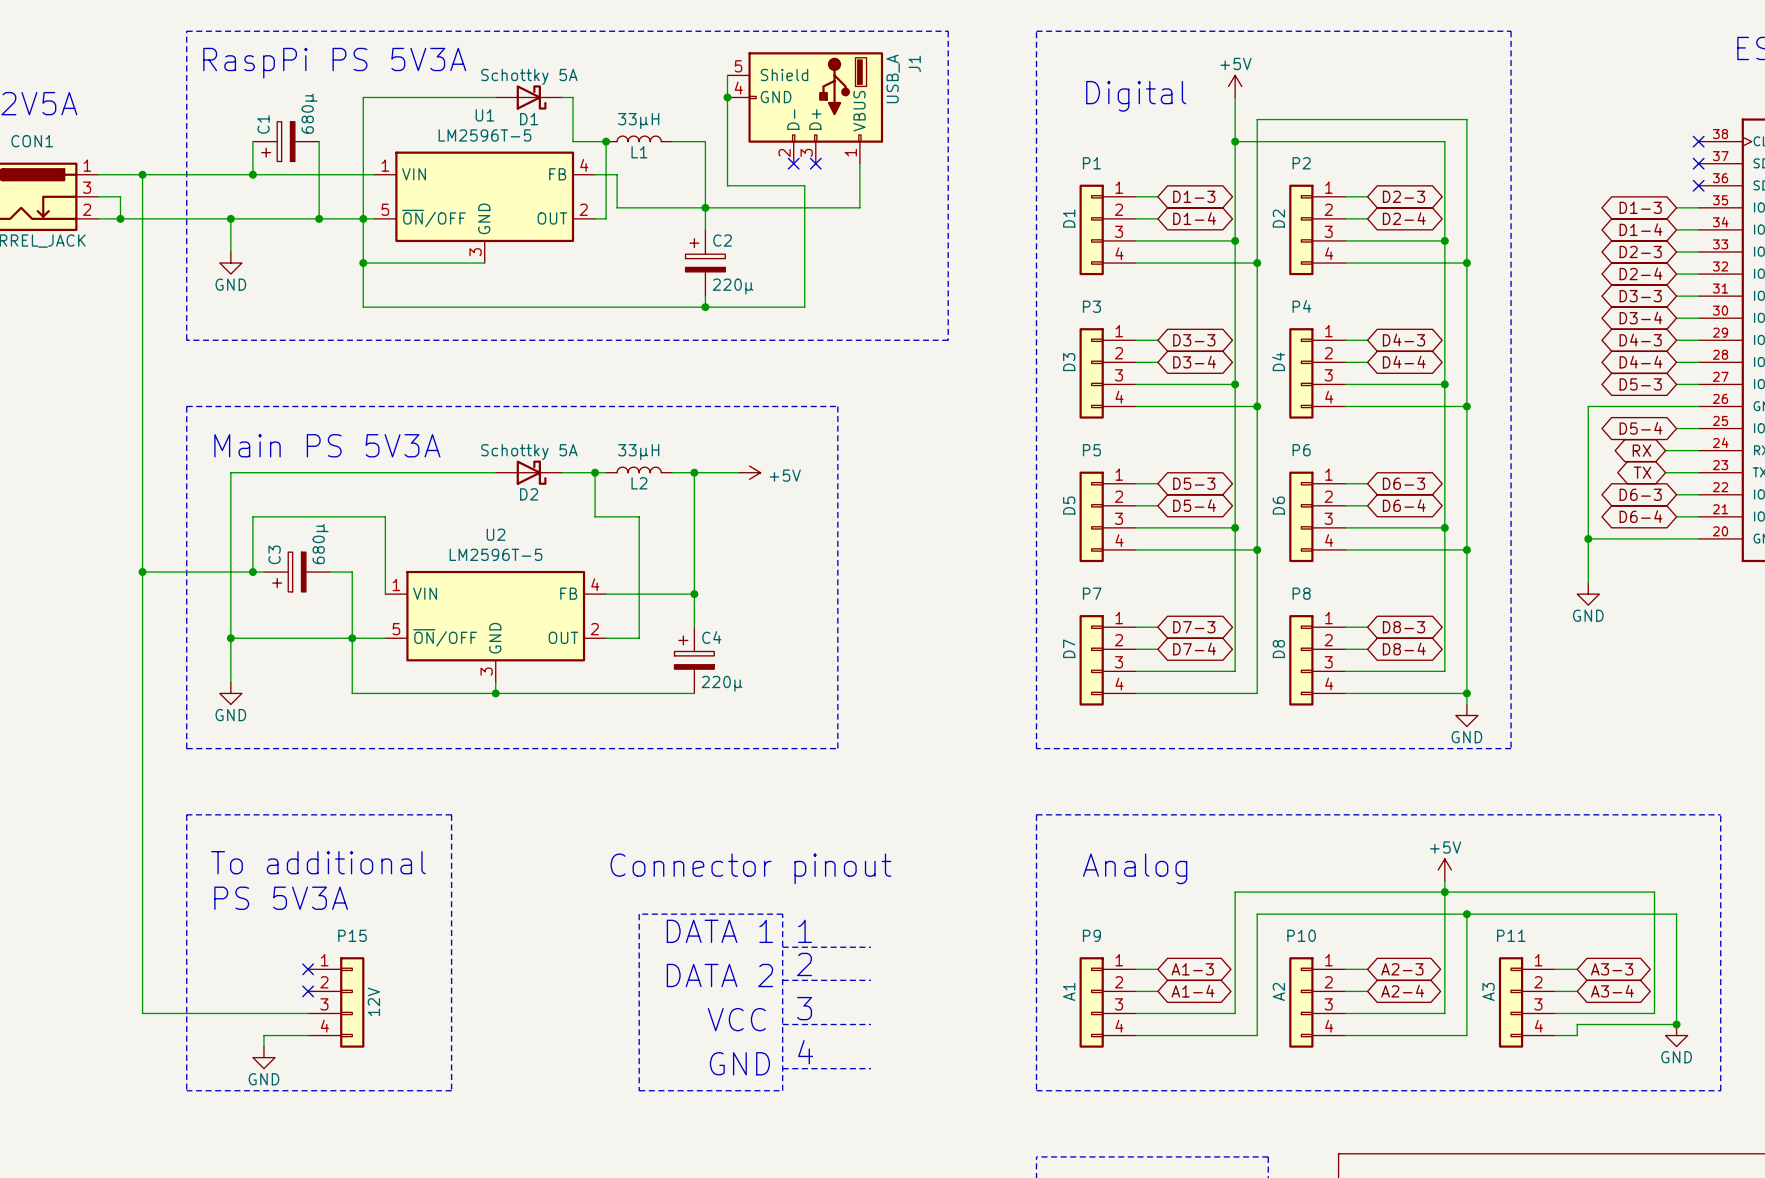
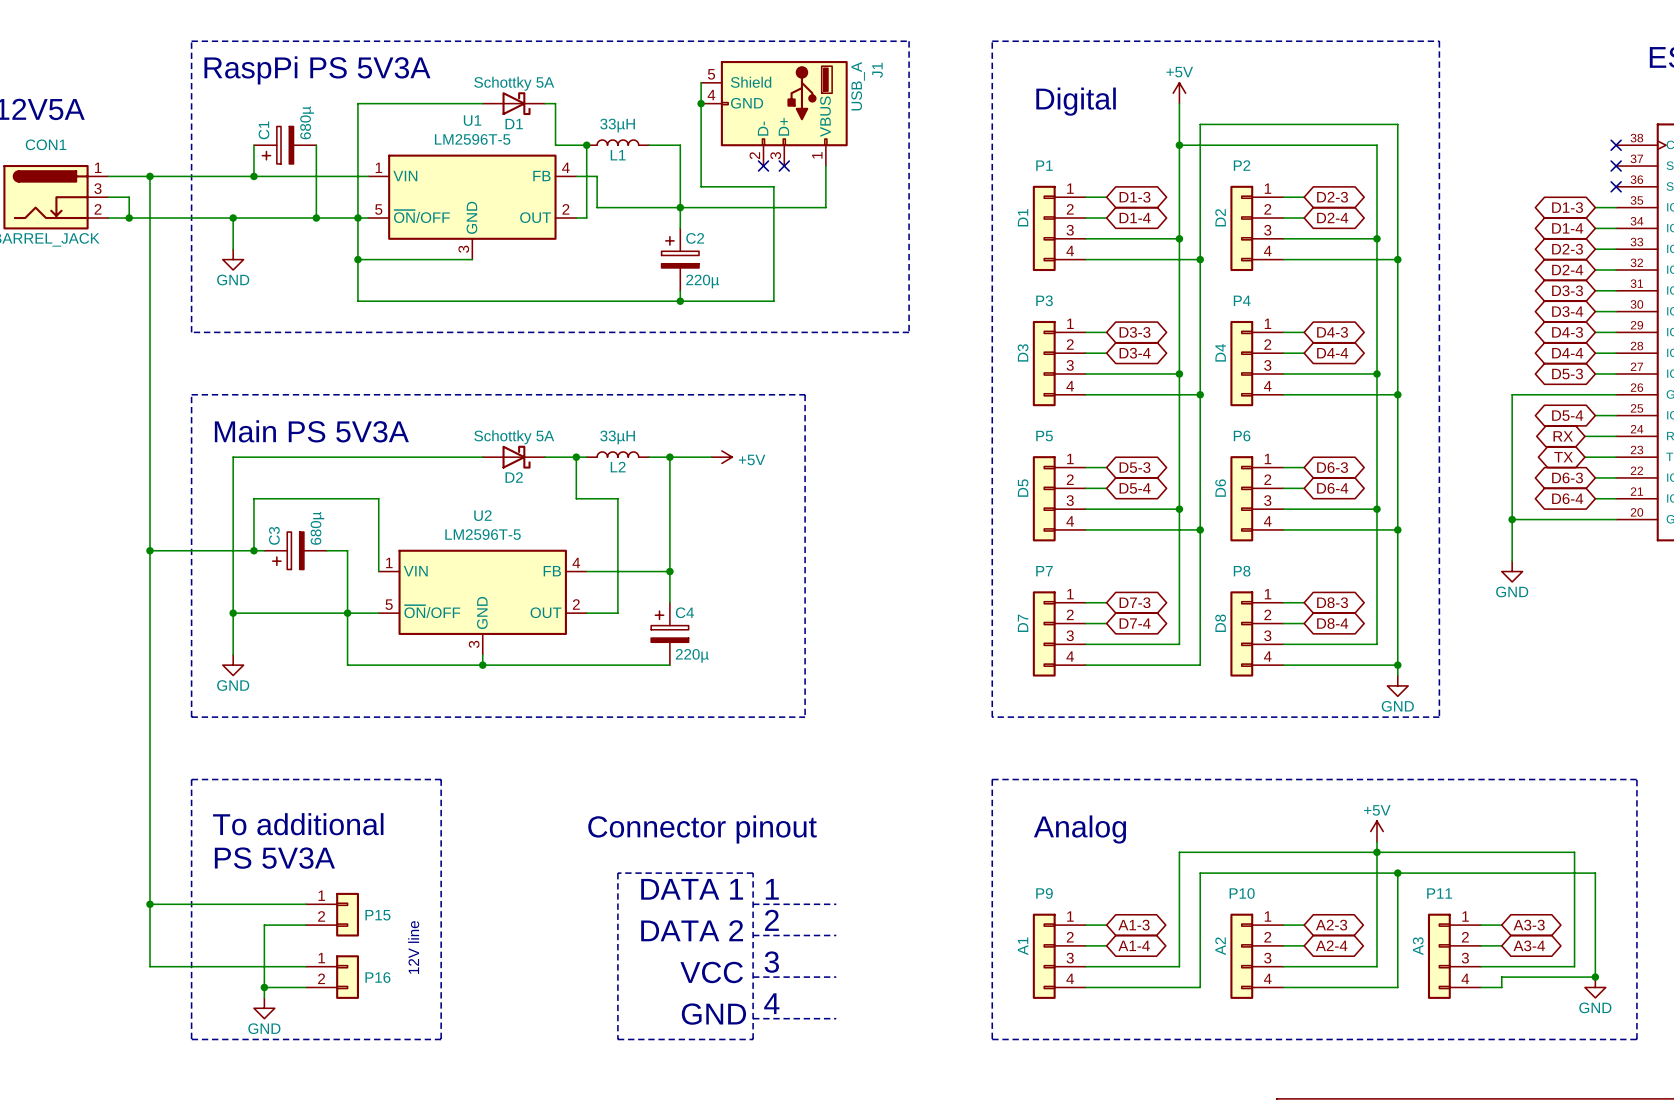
P15 name position: P15 (352, 935) -> P15 (377, 915)
wire: none -> (149, 904) (305, 904)
junction: none -> (149, 904)
P15 symbol: [308, 957, 365, 1048] -> [305, 892, 360, 937]
wire: none -> (305, 925) (264, 925) (264, 987)
no-connect mark: (308, 969) -> none
text: none -> 12V line (413, 947)
no-connect mark: (308, 991) -> none
P15 value: 12V (373, 1001) -> none
P16: none -> (332, 977)
junction: none -> (264, 987)

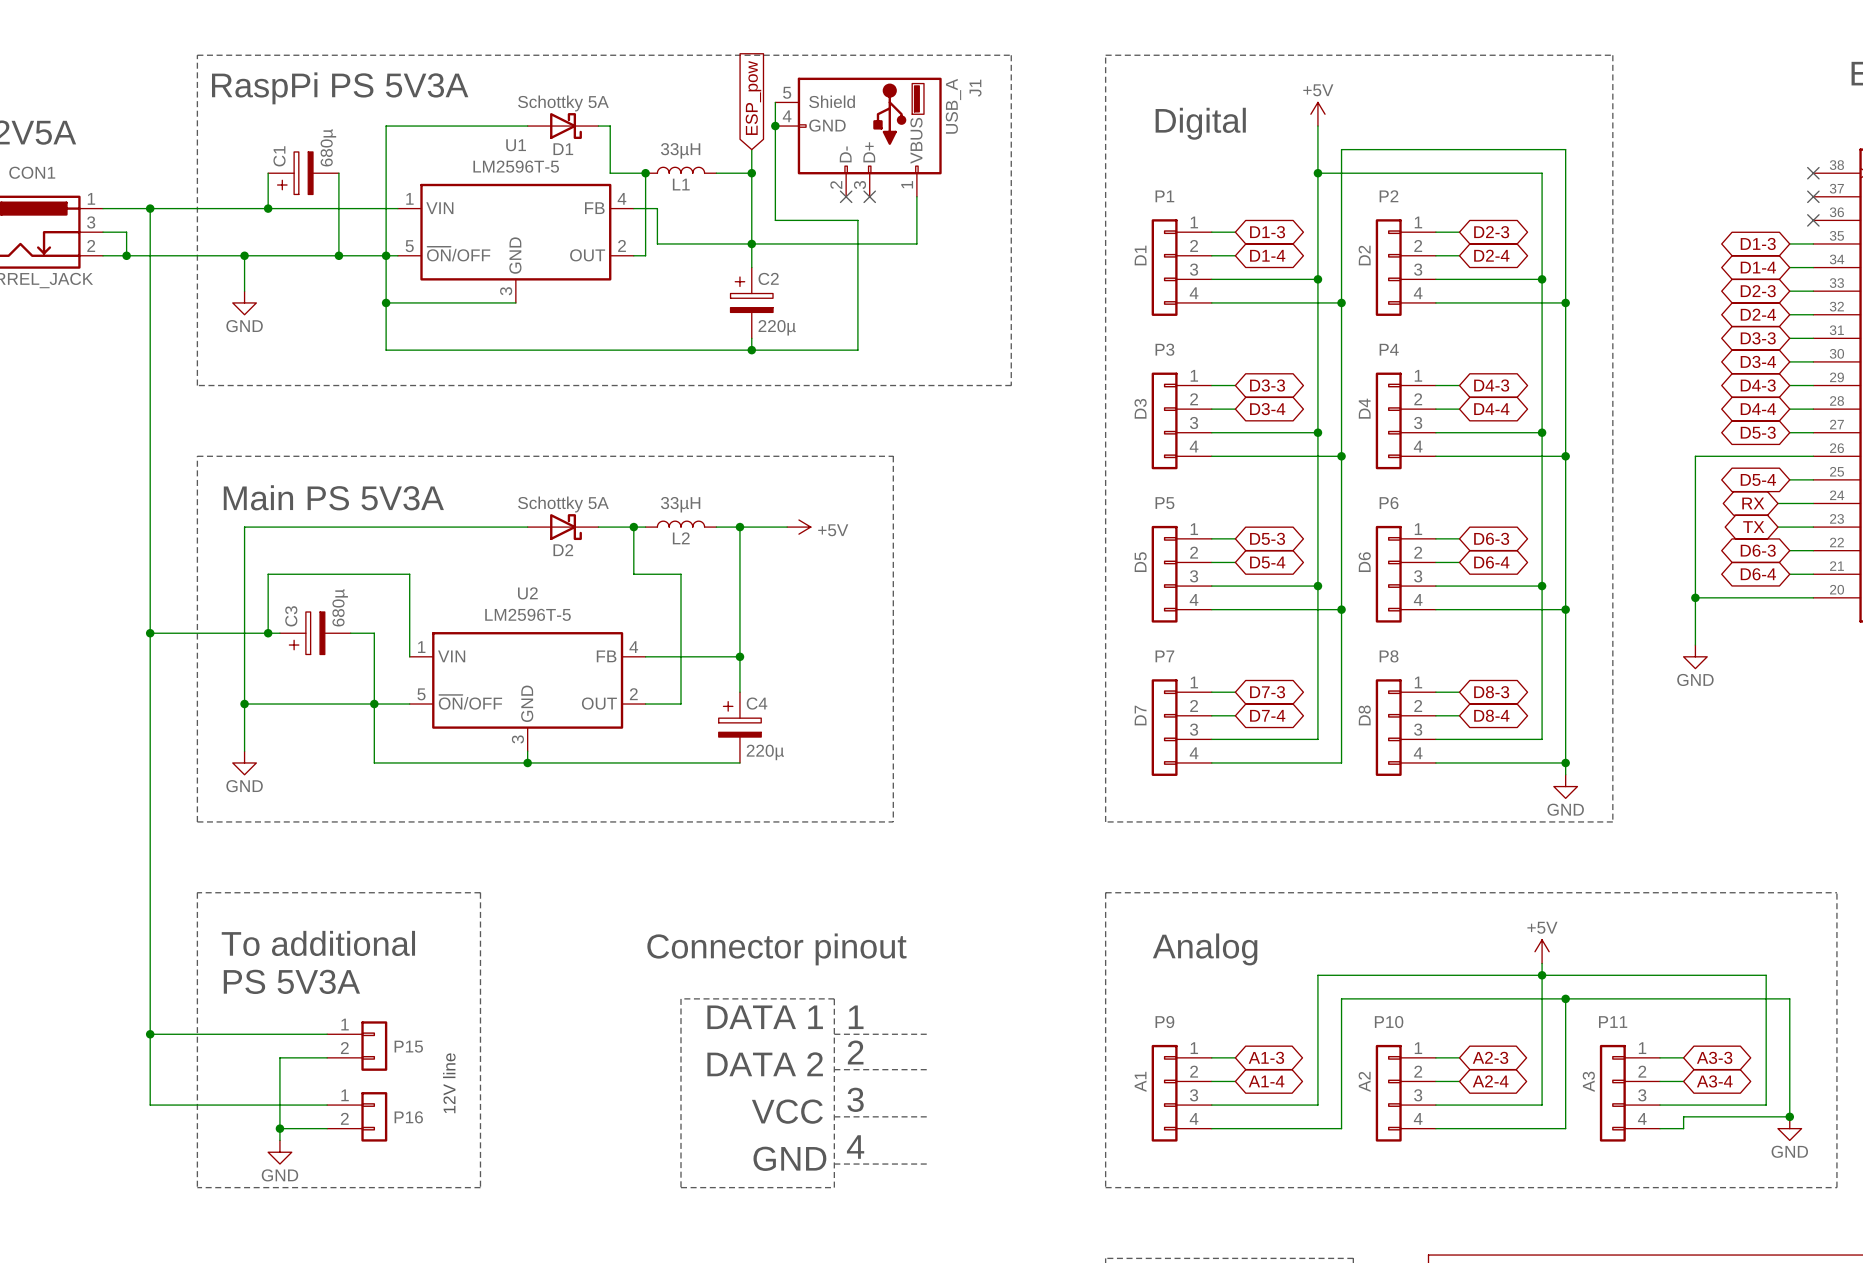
global label: none -> ESP_pow (753, 97)
wire: none -> (751, 149) (751, 173)
junction: none -> (751, 173)

